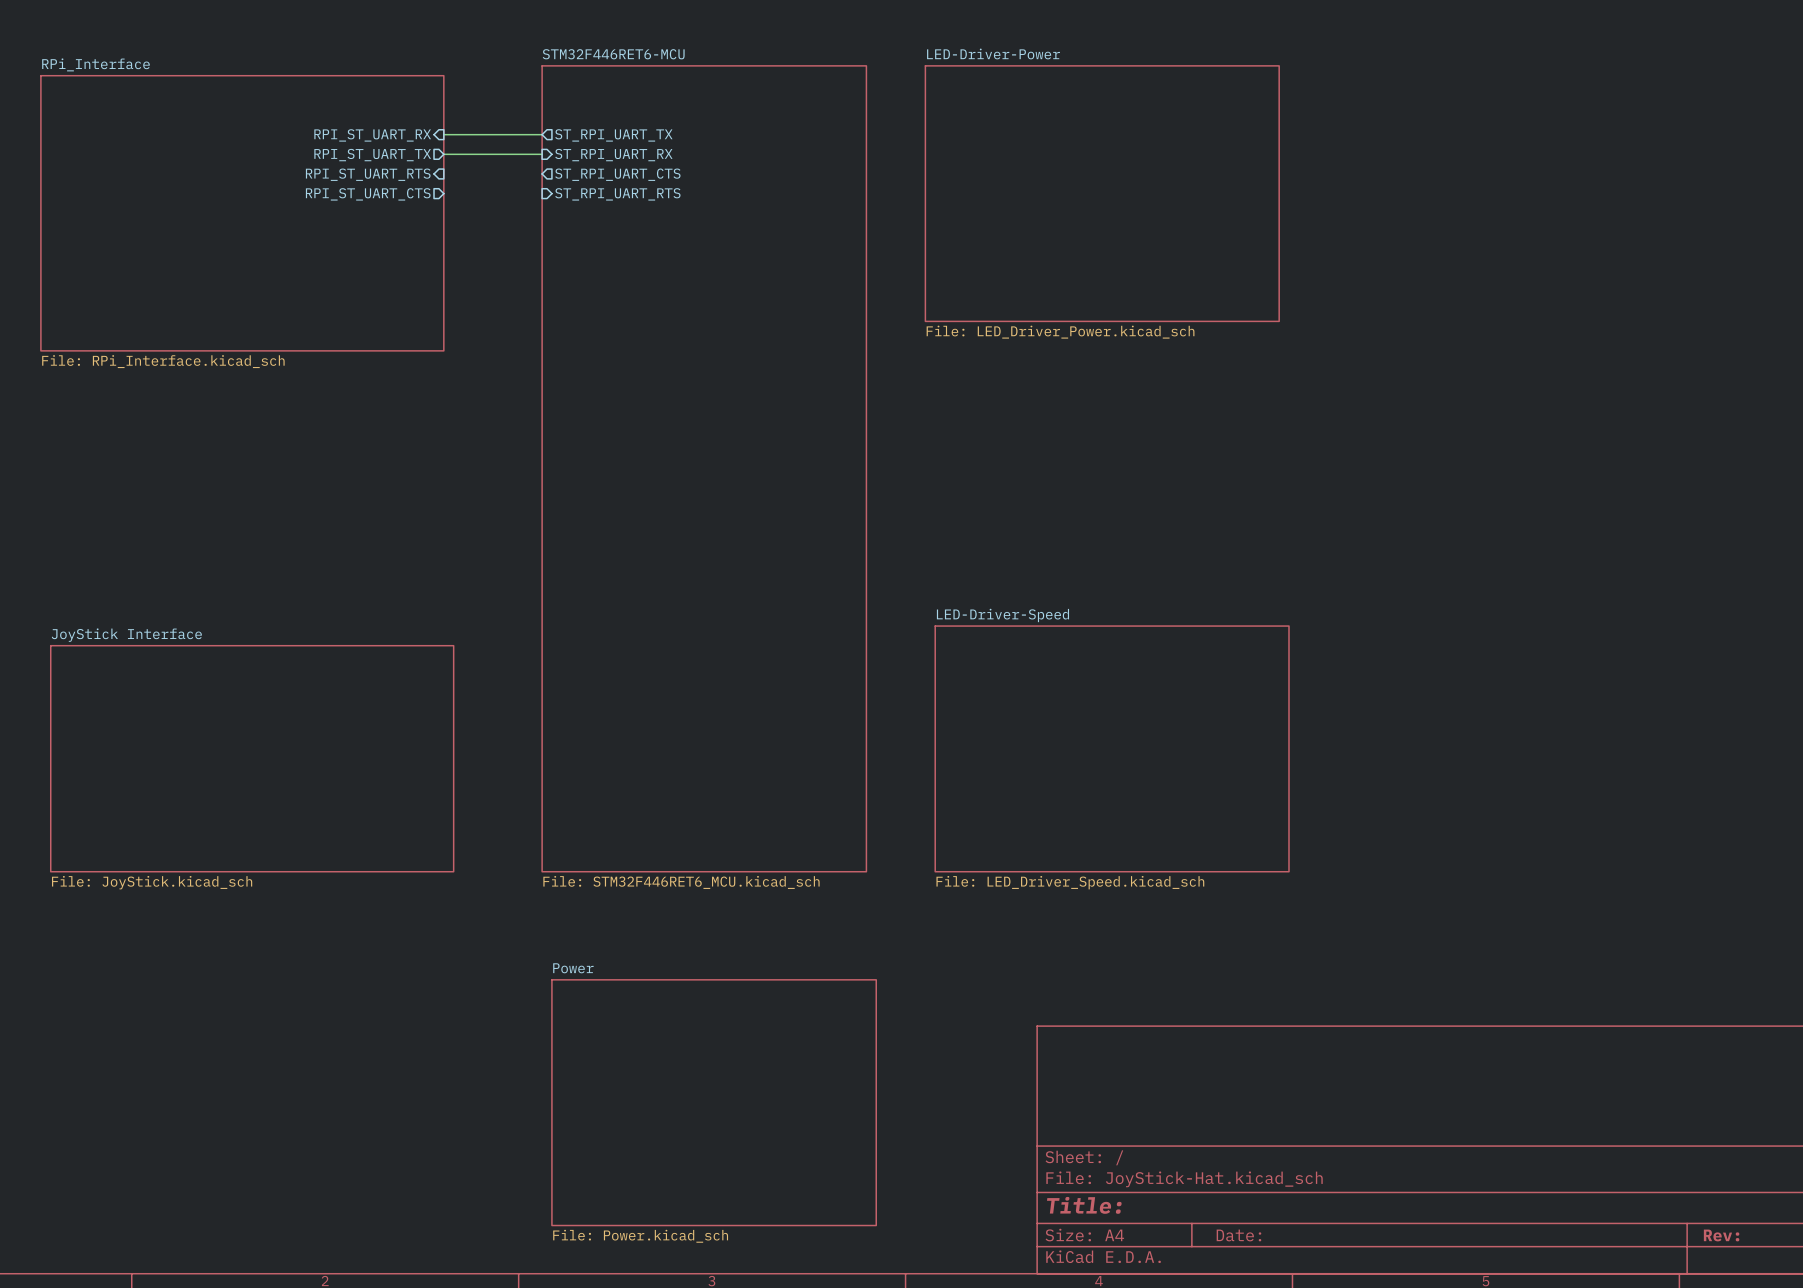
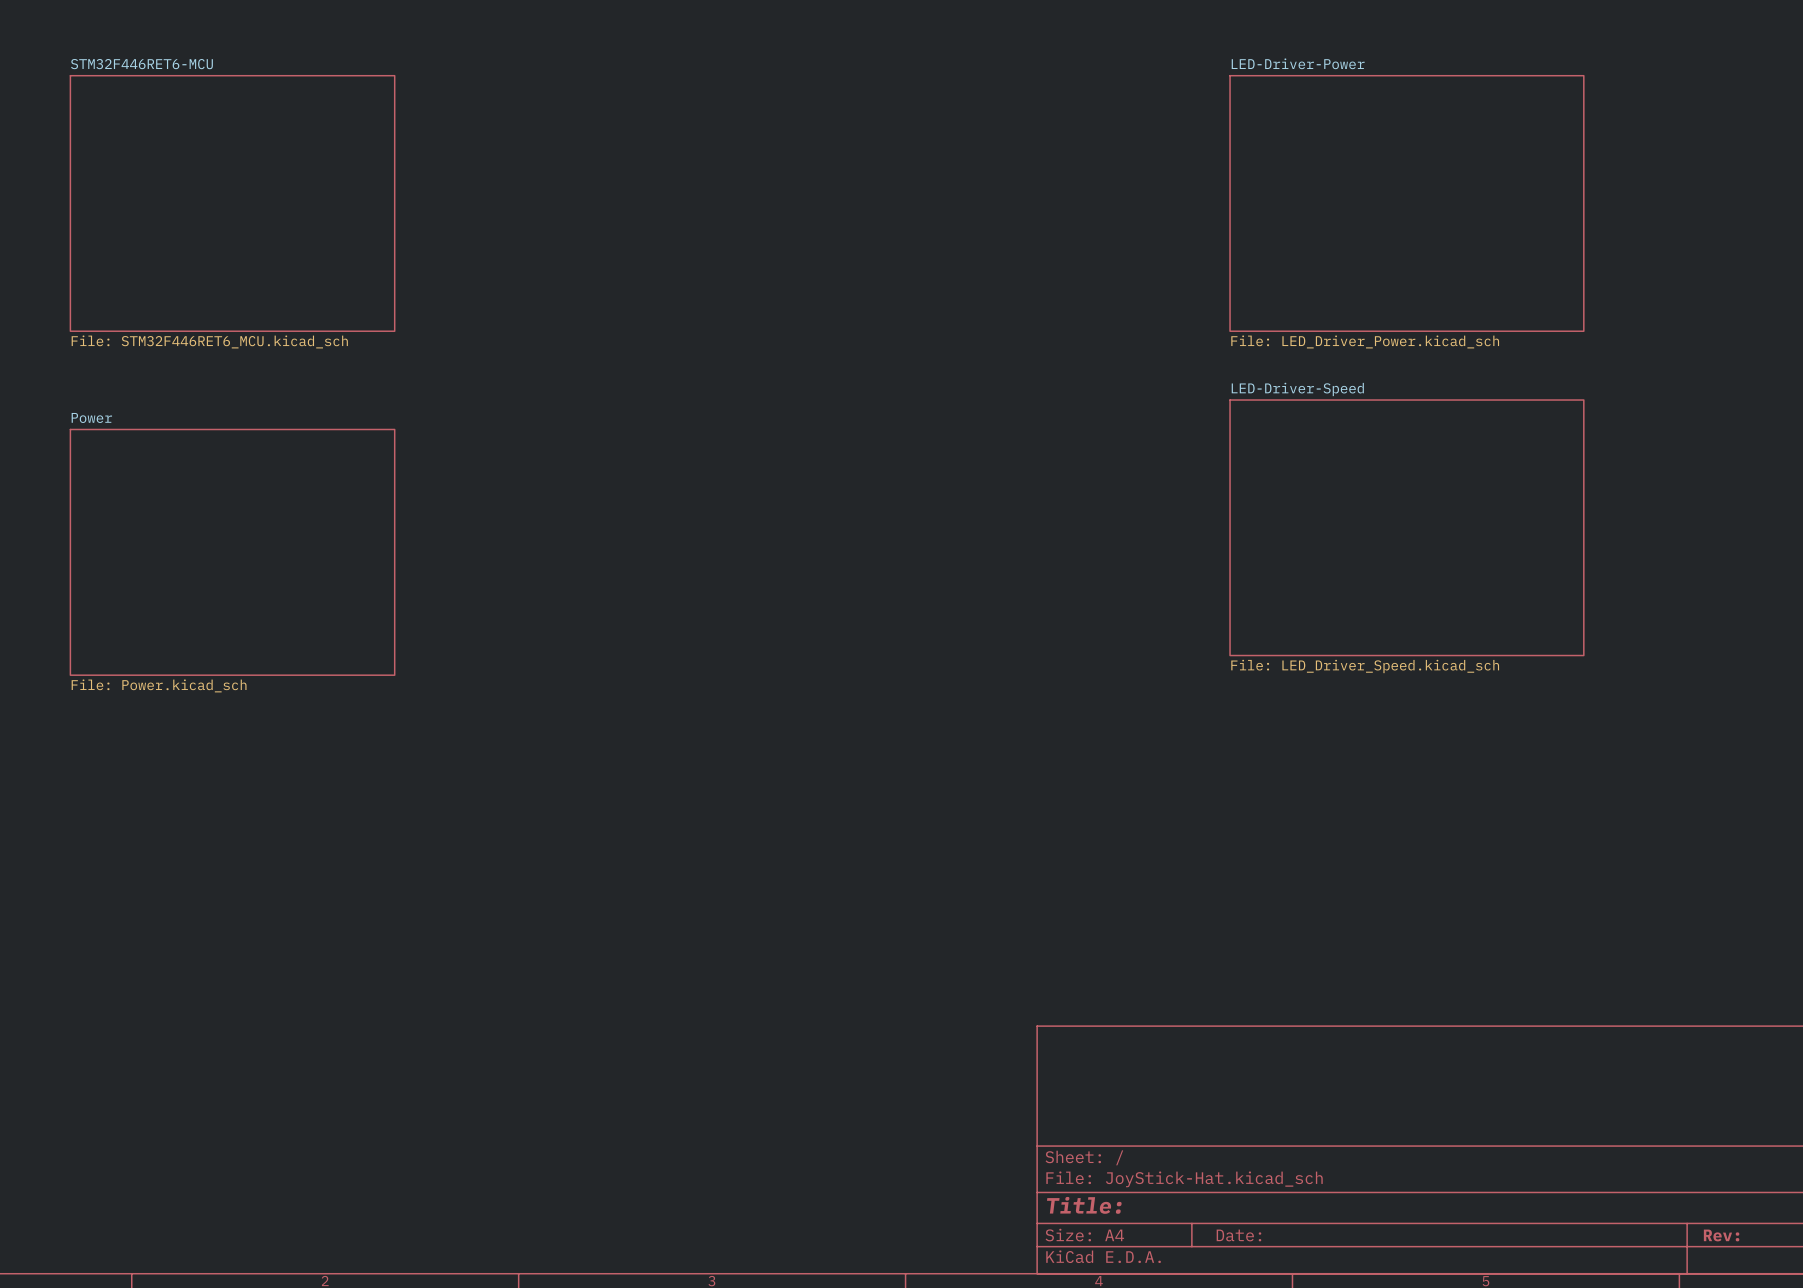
sheet STM32F446RET6-MCU name position: STM32F446RET6-MCU (613, 54) -> STM32F446RET6-MCU (141, 64)
sheet STM32F446RET6-MCU shape: [541, 65, 868, 873] -> [69, 75, 396, 332]
wire: (443, 134) (542, 134) -> none
sheet pin: RPI_ST_UART_RX (372, 135) -> none
sheet pin: ST_RPI_UART_TX (613, 135) -> none
wire: (443, 154) (542, 154) -> none
sheet pin: RPI_ST_UART_TX (372, 155) -> none
sheet pin: ST_RPI_UART_RX (613, 155) -> none
sheet pin: RPI_ST_UART_RTS (368, 174) -> none
sheet pin: ST_RPI_UART_CTS (617, 174) -> none
sheet LED-Driver-Power: File: LED_Driver_Power.kicad_sch (1102, 193) -> none
sheet pin: RPI_ST_UART_CTS (368, 194) -> none
sheet pin: ST_RPI_UART_RTS (617, 194) -> none
sheet LED-Driver-Power: none -> File: LED_Driver_Power.kicad_sch (1406, 203)
sheet RPi_Interface: File: RPi_Interface.kicad_sch (242, 213) -> none
sheet LED-Driver-Speed: none -> File: LED_Driver_Speed.kicad_sch (1406, 527)
sheet Power: none -> File: Power.kicad_sch (232, 552)
sheet LED-Driver-Speed: File: LED_Driver_Speed.kicad_sch (1112, 748) -> none
sheet JoyStick Interface: File: JoyStick.kicad_sch (252, 758) -> none
sheet STM32F446RET6-MCU value position: File: STM32F446RET6_MCU.kicad_sch (681, 882) -> File: STM32F446RET6_MCU.kicad_sch (209, 341)
sheet Power: File: Power.kicad_sch (714, 1102) -> none

